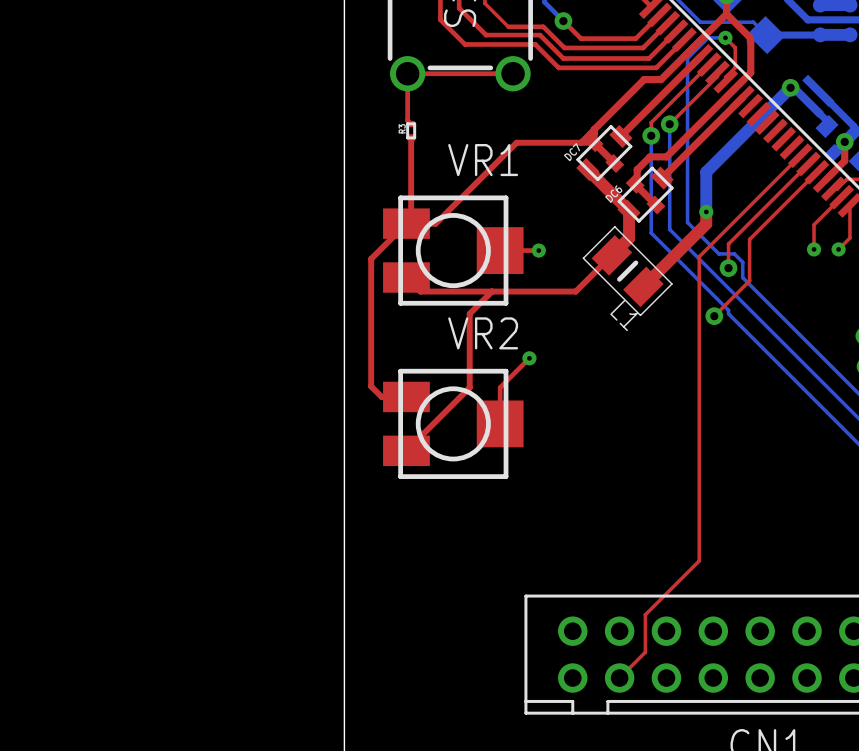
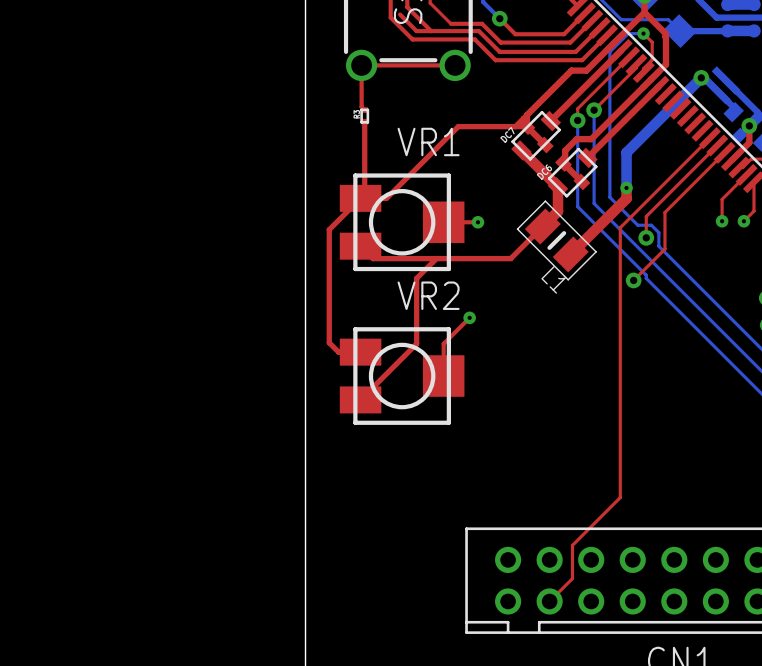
top track: none -> (400, 14) (416, 31) (431, 31)

